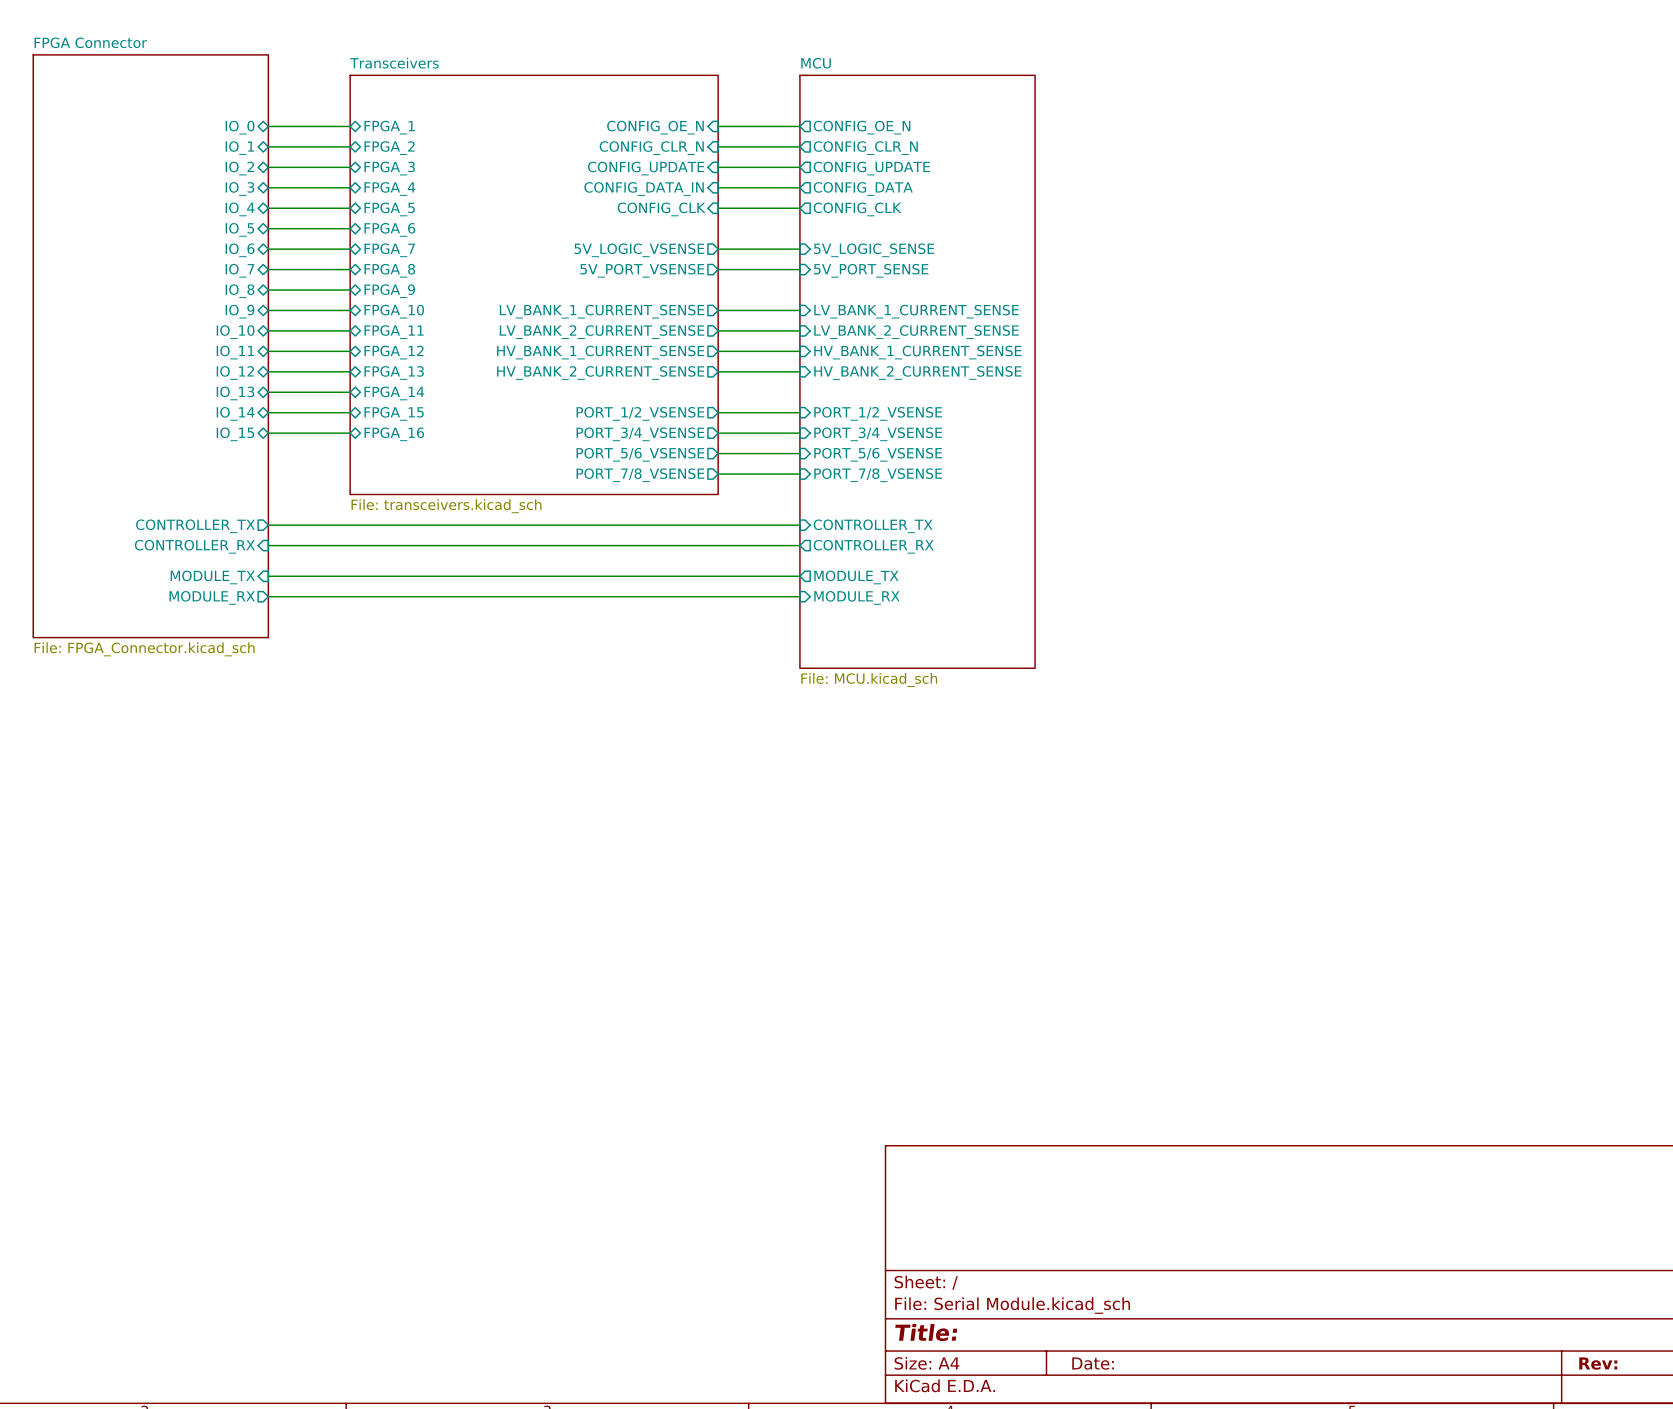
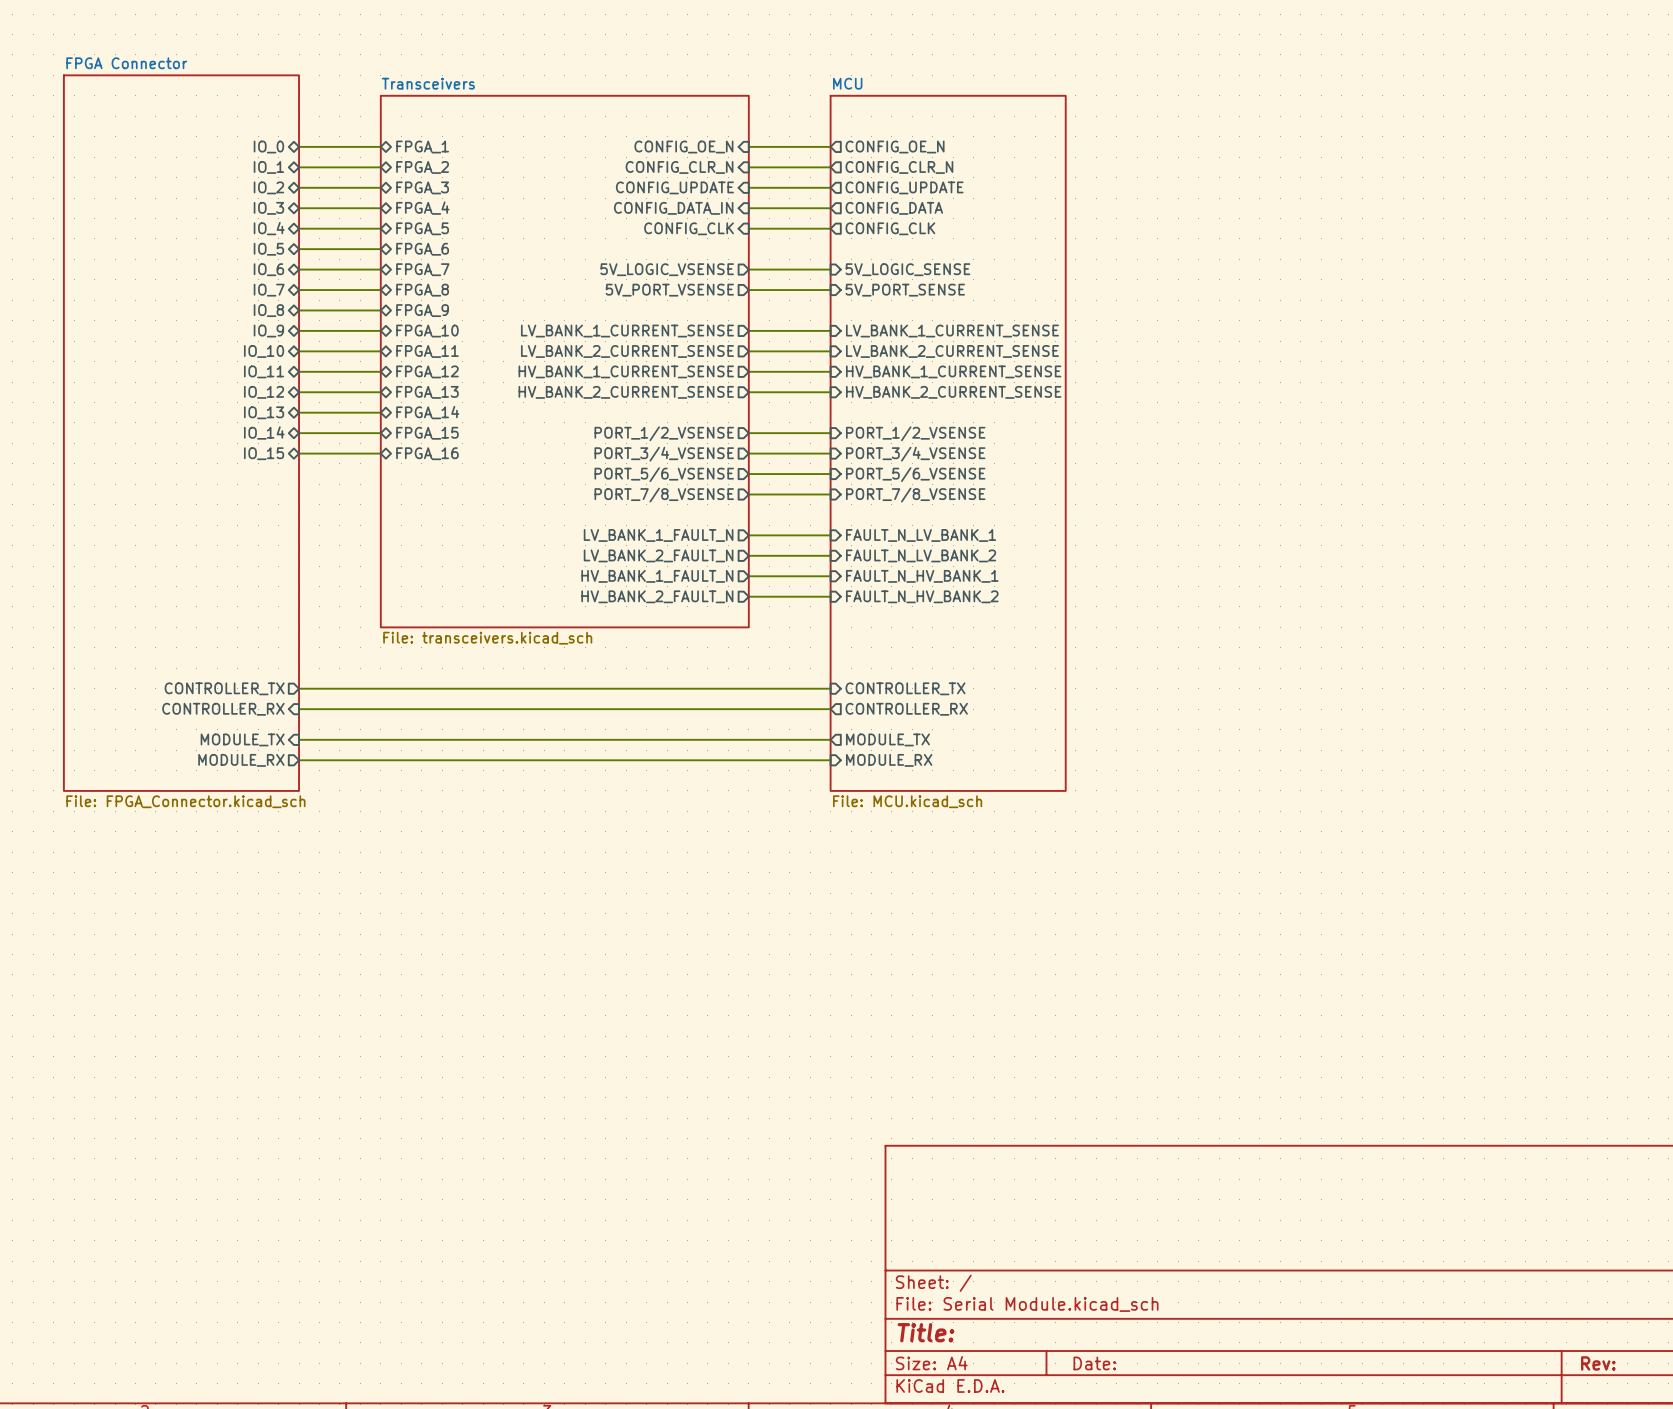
wire: (268, 126) (350, 126) -> none
wire: (718, 126) (799, 126) -> none
sheet pin position: IO_0 (240, 127) -> IO_0 (268, 147)
sheet pin position: FPGA_1 (389, 127) -> FPGA_1 (422, 147)
sheet pin position: CONFIG_OE_N (655, 127) -> CONFIG_OE_N (683, 147)
sheet pin position: CONFIG_OE_N (862, 127) -> CONFIG_OE_N (895, 147)
wire: (268, 146) (299, 146) -> (350, 146) (380, 146)
wire: (718, 146) (748, 146) -> (799, 146) (830, 146)
sheet pin position: IO_1 (239, 148) -> IO_1 (268, 167)
sheet pin position: FPGA_2 (389, 148) -> FPGA_2 (422, 167)
sheet pin position: CONFIG_CLR_N (651, 148) -> CONFIG_CLR_N (679, 167)
sheet pin position: CONFIG_CLR_N (865, 148) -> CONFIG_CLR_N (899, 167)
wire: (268, 167) (299, 167) -> (350, 167) (380, 167)
wire: (718, 167) (748, 167) -> (799, 167) (830, 167)
sheet pin position: IO_2 (239, 168) -> IO_2 (268, 187)
sheet pin position: FPGA_3 (389, 168) -> FPGA_3 (422, 187)
sheet pin position: CONFIG_UPDATE (646, 168) -> CONFIG_UPDATE (674, 187)
sheet pin position: CONFIG_UPDATE (871, 168) -> CONFIG_UPDATE (904, 187)
wire: (268, 187) (299, 187) -> (350, 187) (380, 187)
wire: (718, 187) (748, 187) -> (799, 187) (830, 187)
sheet pin position: IO_3 (239, 188) -> IO_3 (268, 208)
sheet pin position: FPGA_4 (389, 188) -> FPGA_4 (422, 208)
sheet pin position: CONFIG_DATA_IN (644, 188) -> CONFIG_DATA_IN (673, 208)
sheet pin position: CONFIG_DATA (863, 188) -> CONFIG_DATA (894, 208)
wire: (268, 208) (299, 208) -> (350, 208) (380, 208)
wire: (718, 208) (748, 208) -> (799, 208) (830, 208)
sheet pin position: IO_4 (240, 209) -> IO_4 (269, 228)
sheet pin position: FPGA_5 (389, 209) -> FPGA_5 (422, 228)
sheet pin position: CONFIG_CLK (661, 209) -> CONFIG_CLK (689, 228)
sheet pin position: CONFIG_CLK (857, 209) -> CONFIG_CLK (890, 228)
wire: (268, 228) (299, 228) -> (350, 228) (380, 228)
sheet pin position: IO_5 (239, 229) -> IO_5 (268, 249)
sheet pin position: FPGA_6 (389, 229) -> FPGA_6 (422, 249)
wire: (268, 249) (299, 249) -> (350, 249) (380, 249)
wire: (718, 249) (799, 249) -> (748, 228) (830, 228)
sheet pin position: IO_6 (240, 250) -> IO_6 (268, 269)
sheet pin position: FPGA_7 (389, 250) -> FPGA_7 (422, 269)
sheet pin position: 5V_LOGIC_VSENSE (639, 250) -> 5V_LOGIC_VSENSE (667, 269)
sheet pin position: 5V_LOGIC_SENSE (874, 250) -> 5V_LOGIC_SENSE (907, 269)
wire: (268, 269) (299, 269) -> (350, 269) (380, 269)
wire: (718, 269) (748, 269) -> (799, 269) (830, 269)
sheet pin position: IO_7 (239, 270) -> IO_7 (269, 290)
sheet pin position: FPGA_8 (389, 270) -> FPGA_8 (422, 290)
sheet pin position: 5V_PORT_VSENSE (642, 270) -> 5V_PORT_VSENSE (669, 290)
sheet pin position: 5V_PORT_SENSE (871, 270) -> 5V_PORT_SENSE (905, 290)
sheet Transceivers: File: transceivers.kicad_sch (534, 284) -> none
wire: (268, 290) (299, 290) -> (350, 290) (380, 290)
sheet pin position: IO_8 (240, 291) -> IO_8 (268, 310)
sheet pin position: FPGA_9 (389, 291) -> FPGA_9 (422, 310)
wire: (268, 310) (299, 310) -> (350, 310) (380, 310)
wire: (718, 310) (799, 310) -> (748, 290) (830, 290)
sheet pin position: IO_9 (240, 311) -> IO_9 (268, 331)
sheet pin position: FPGA_10 (394, 311) -> FPGA_10 (427, 331)
sheet pin position: LV_BANK_1_CURRENT_SENSE (602, 311) -> LV_BANK_1_CURRENT_SENSE (627, 331)
sheet pin position: LV_BANK_1_CURRENT_SENSE (916, 311) -> LV_BANK_1_CURRENT_SENSE (952, 331)
wire: (268, 330) (299, 330) -> (350, 330) (380, 330)
wire: (718, 330) (748, 330) -> (799, 330) (830, 330)
sheet pin position: IO_10 (235, 332) -> IO_10 (264, 351)
sheet pin position: FPGA_11 (394, 332) -> FPGA_11 (427, 351)
sheet pin position: LV_BANK_2_CURRENT_SENSE (602, 332) -> LV_BANK_2_CURRENT_SENSE (627, 351)
sheet pin position: LV_BANK_2_CURRENT_SENSE (916, 332) -> LV_BANK_2_CURRENT_SENSE (952, 351)
sheet FPGA Connector: File: FPGA_Connector.kicad_sch (150, 346) -> none
wire: (268, 351) (299, 351) -> (350, 351) (380, 351)
wire: (718, 351) (748, 351) -> (799, 351) (830, 351)
sheet pin position: IO_11 (235, 352) -> IO_11 (264, 371)
sheet pin position: FPGA_12 (394, 352) -> FPGA_12 (427, 371)
sheet pin position: HV_BANK_1_CURRENT_SENSE (600, 352) -> HV_BANK_1_CURRENT_SENSE (626, 371)
sheet pin position: HV_BANK_1_CURRENT_SENSE (917, 352) -> HV_BANK_1_CURRENT_SENSE (953, 371)
sheet Transceivers: none -> File: transceivers.kicad_sch (564, 361)
wire: (268, 371) (299, 371) -> (350, 371) (380, 371)
wire: (718, 371) (748, 371) -> (799, 371) (830, 371)
sheet MCU: File: MCU.kicad_sch (917, 371) -> none
sheet pin position: IO_12 (235, 372) -> IO_12 (264, 392)
sheet pin position: FPGA_13 (394, 372) -> FPGA_13 (427, 392)
sheet pin position: HV_BANK_2_CURRENT_SENSE (600, 372) -> HV_BANK_2_CURRENT_SENSE (626, 392)
sheet pin position: HV_BANK_2_CURRENT_SENSE (917, 372) -> HV_BANK_2_CURRENT_SENSE (953, 392)
wire: (268, 392) (299, 392) -> (350, 392) (380, 392)
sheet pin position: IO_13 (235, 393) -> IO_13 (264, 412)
sheet pin position: FPGA_14 (394, 393) -> FPGA_14 (427, 412)
wire: (268, 412) (299, 412) -> (350, 412) (380, 412)
wire: (718, 412) (799, 412) -> (748, 392) (830, 392)
sheet pin position: IO_14 (235, 413) -> IO_14 (264, 433)
sheet pin position: FPGA_15 (394, 413) -> FPGA_15 (427, 433)
sheet pin position: PORT_1/2_VSENSE (640, 413) -> PORT_1/2_VSENSE (664, 433)
sheet pin position: PORT_1/2_VSENSE (878, 413) -> PORT_1/2_VSENSE (915, 433)
sheet FPGA Connector: none -> File: FPGA_Connector.kicad_sch (181, 433)
wire: (268, 433) (299, 433) -> (350, 433) (380, 433)
wire: (718, 433) (748, 433) -> (799, 433) (830, 433)
sheet pin position: IO_15 (235, 434) -> IO_15 (264, 453)
sheet pin position: FPGA_16 (394, 434) -> FPGA_16 (427, 453)
sheet pin position: PORT_3/4_VSENSE (640, 434) -> PORT_3/4_VSENSE (664, 454)
sheet pin position: PORT_3/4_VSENSE (878, 434) -> PORT_3/4_VSENSE (915, 454)
sheet MCU: none -> File: MCU.kicad_sch (948, 443)
wire: none -> (299, 453) (380, 453)
wire: (718, 453) (748, 453) -> (799, 453) (830, 453)
sheet pin position: PORT_5/6_VSENSE (640, 454) -> PORT_5/6_VSENSE (664, 474)
sheet pin position: PORT_5/6_VSENSE (878, 454) -> PORT_5/6_VSENSE (915, 474)
wire: (718, 474) (748, 474) -> (799, 474) (830, 474)
sheet pin position: PORT_7/8_VSENSE (640, 475) -> PORT_7/8_VSENSE (664, 495)
sheet pin position: PORT_7/8_VSENSE (878, 475) -> PORT_7/8_VSENSE (915, 495)
wire: none -> (748, 494) (830, 494)
wire: (268, 525) (799, 525) -> (299, 709) (830, 709)
sheet pin position: CONTROLLER_TX (195, 526) -> CONTROLLER_TX (224, 688)
sheet pin position: CONTROLLER_TX (873, 526) -> CONTROLLER_TX (905, 688)
wire: none -> (748, 535) (830, 535)
sheet pin: none -> LV_BANK_1_FAULT_N (658, 535)
sheet pin: none -> FAULT_N_LV_BANK_1 (921, 535)
wire: (268, 545) (799, 545) -> (299, 688) (830, 688)
sheet pin position: CONTROLLER_RX (194, 546) -> CONTROLLER_RX (223, 709)
sheet pin position: CONTROLLER_RX (873, 546) -> CONTROLLER_RX (906, 709)
wire: none -> (748, 555) (830, 555)
sheet pin: none -> LV_BANK_2_FAULT_N (658, 555)
sheet pin: none -> FAULT_N_LV_BANK_2 (921, 555)
wire: (268, 576) (748, 576) -> none
wire: none -> (799, 576) (830, 576)
sheet pin position: MODULE_TX (212, 577) -> MODULE_TX (242, 739)
sheet pin: none -> HV_BANK_1_FAULT_N (657, 576)
sheet pin position: MODULE_TX (856, 577) -> MODULE_TX (887, 739)
sheet pin: none -> FAULT_N_HV_BANK_1 (922, 576)
wire: (268, 596) (748, 596) -> none
wire: none -> (799, 596) (830, 596)
sheet pin position: MODULE_RX (212, 597) -> MODULE_RX (241, 760)
sheet pin: none -> HV_BANK_2_FAULT_N (657, 596)
sheet pin position: MODULE_RX (857, 597) -> MODULE_RX (889, 760)
sheet pin: none -> FAULT_N_HV_BANK_2 (922, 596)
wire: none -> (299, 739) (830, 739)
wire: none -> (299, 760) (830, 760)

